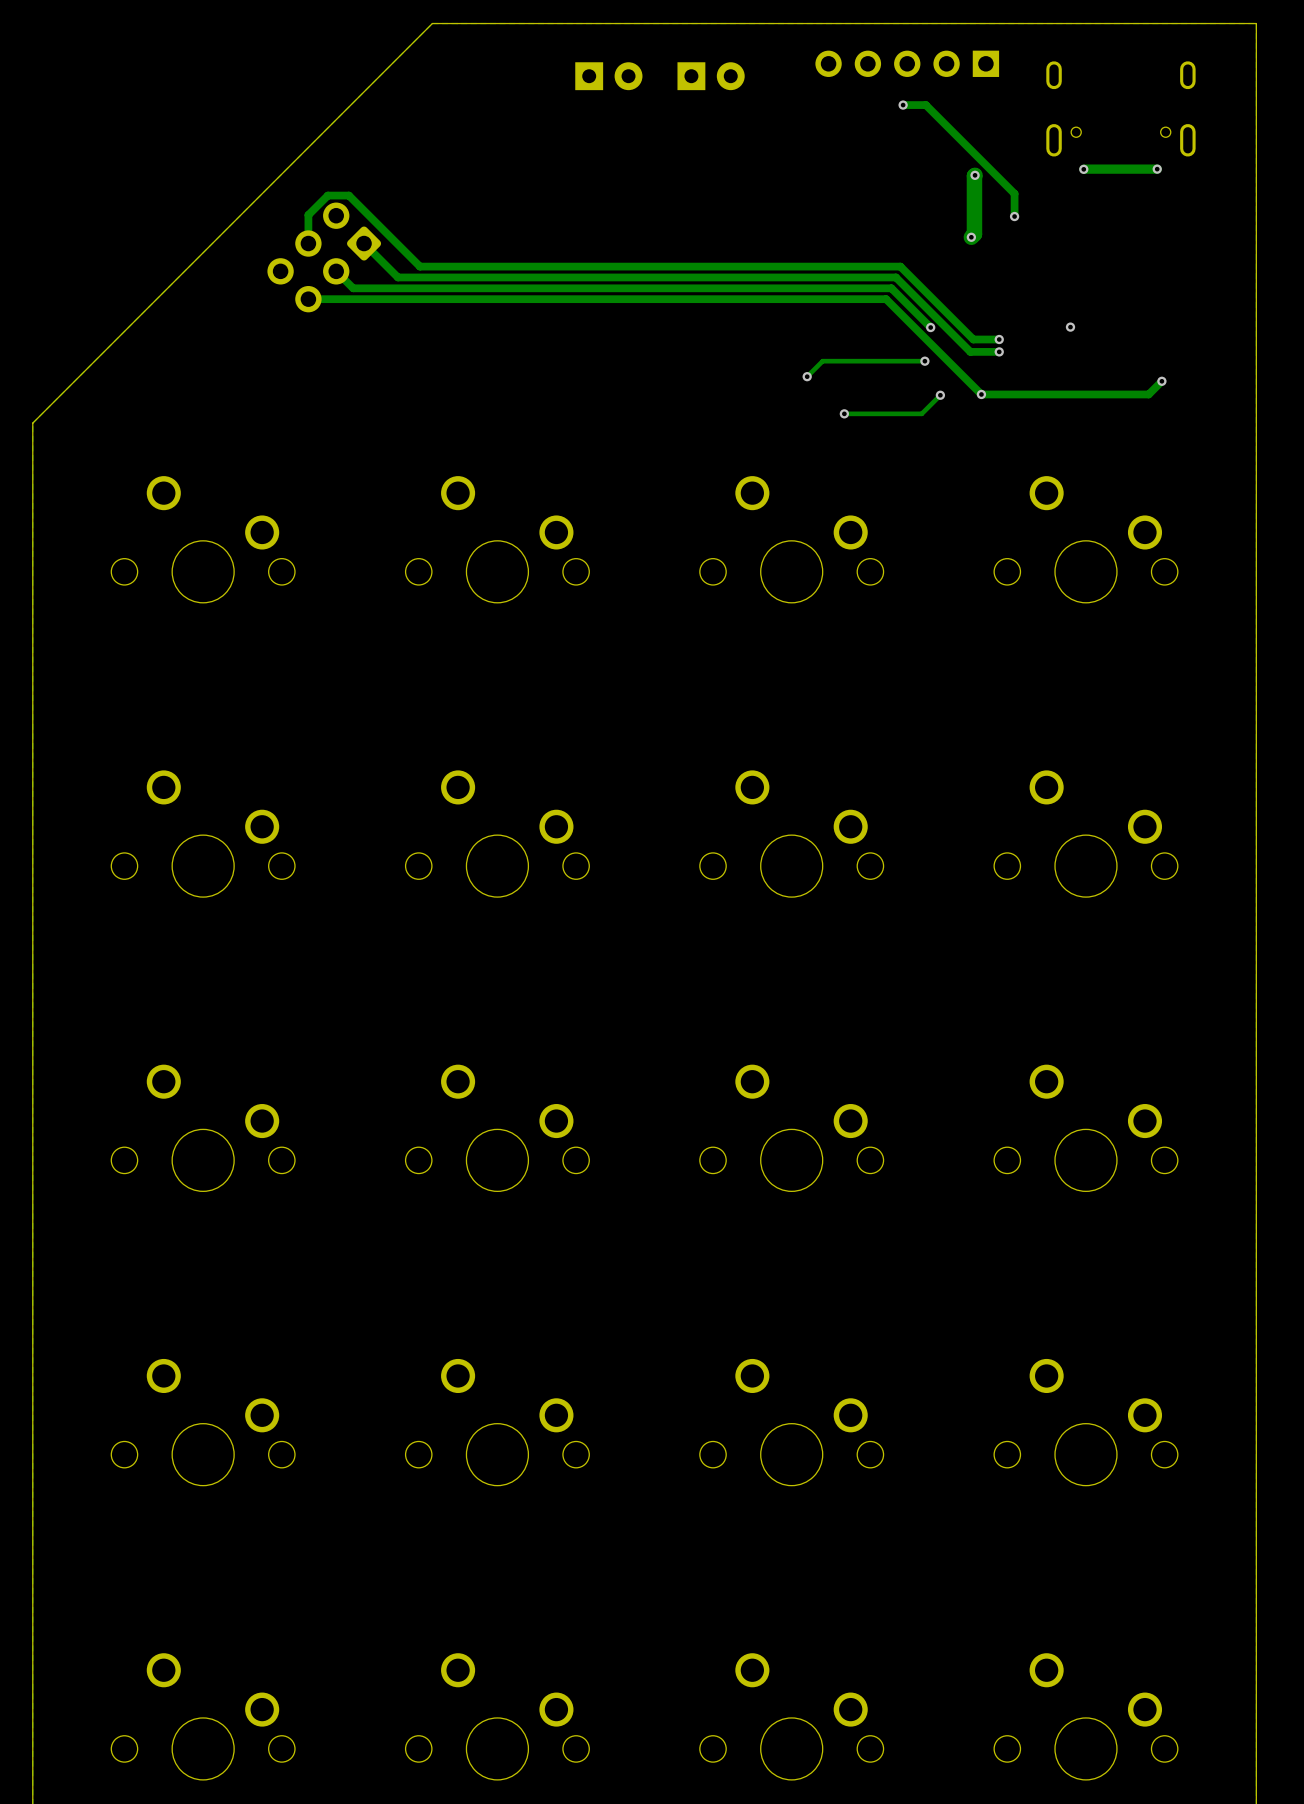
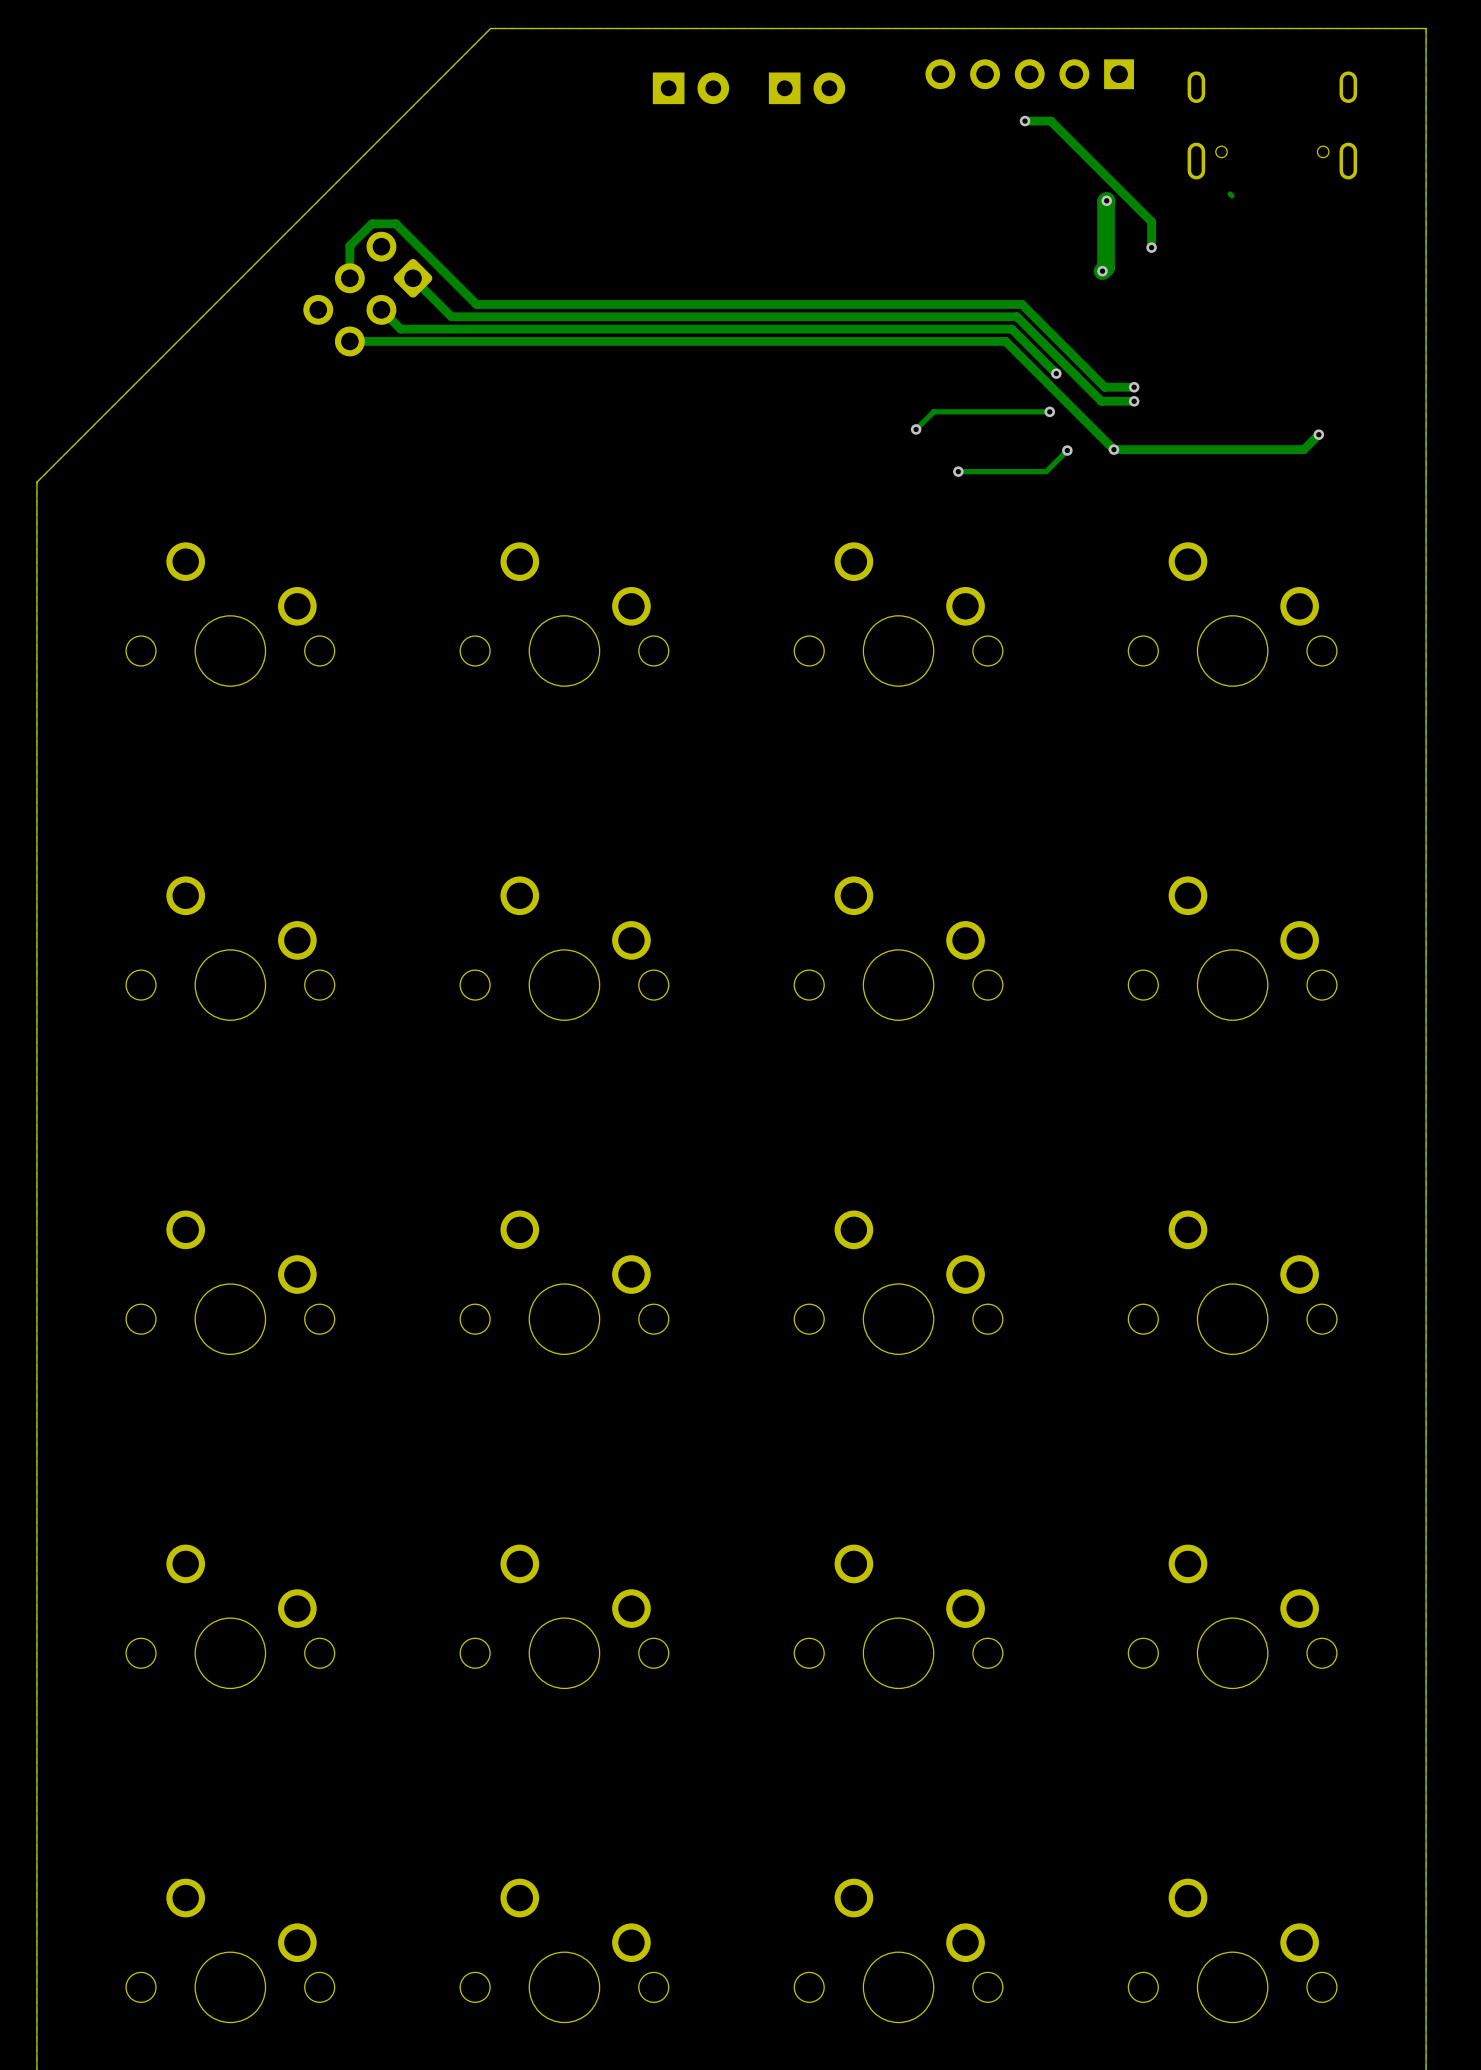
via: (1083, 169) -> none
track: (1157, 169) (1083, 169) -> none
via: (1157, 169) -> none
via: (1070, 327) -> none

